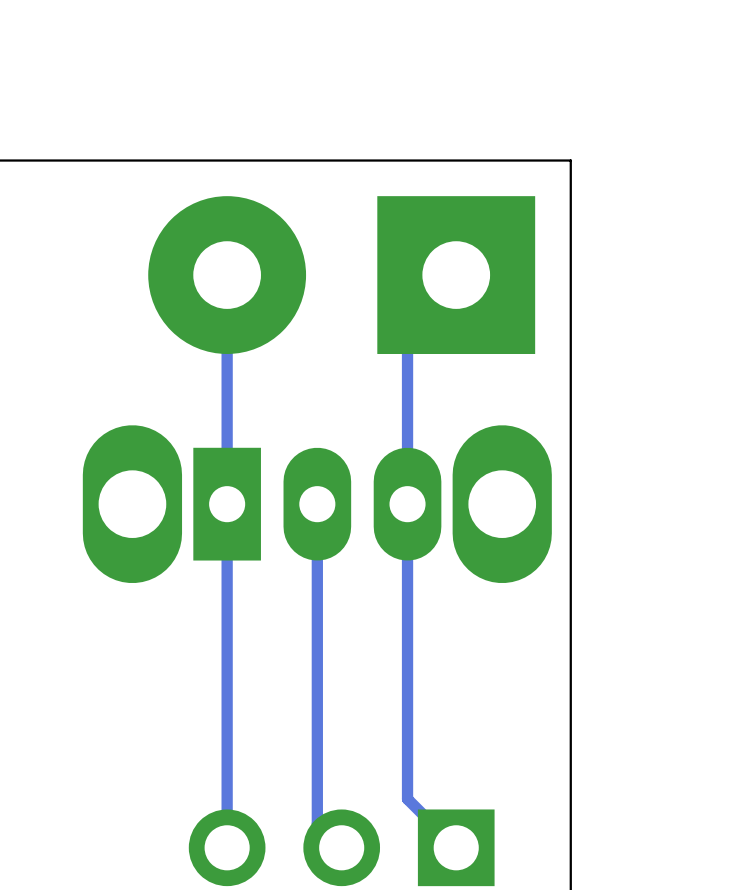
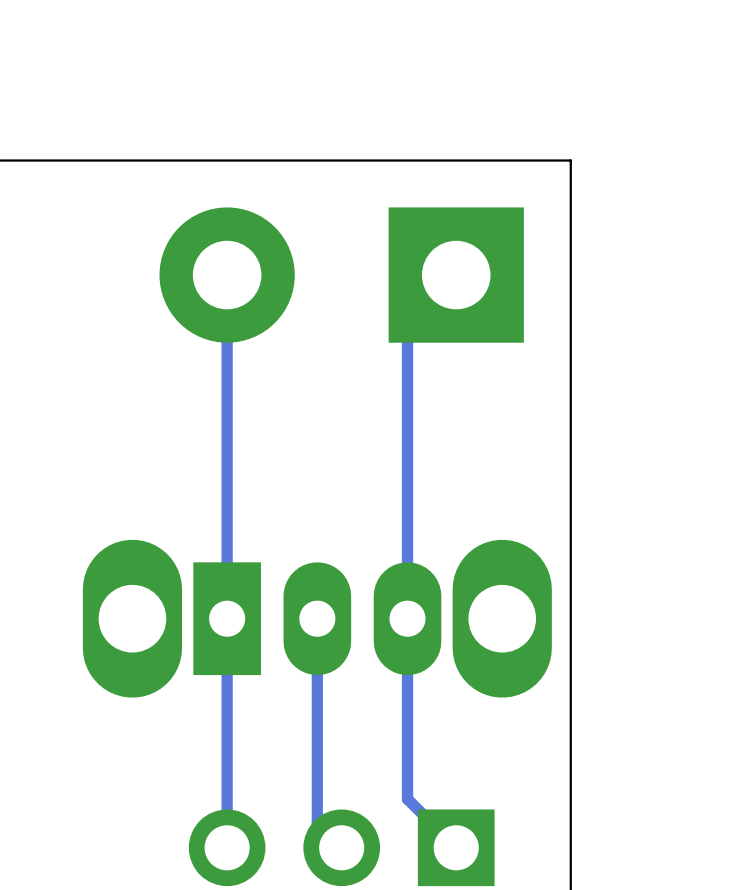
part footprint: [148, 196, 536, 354] -> [159, 207, 524, 343]
track: (317, 504) (317, 618) -> none
part position: (317, 504) -> (317, 618)

